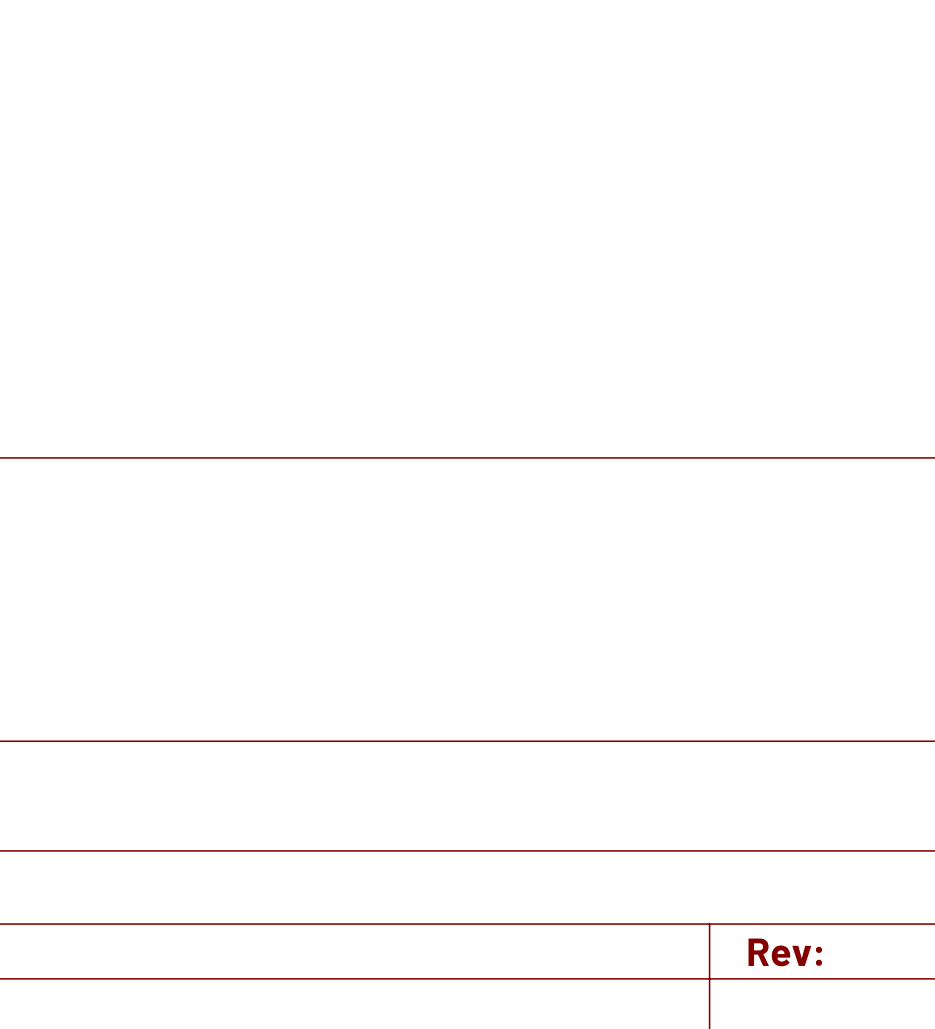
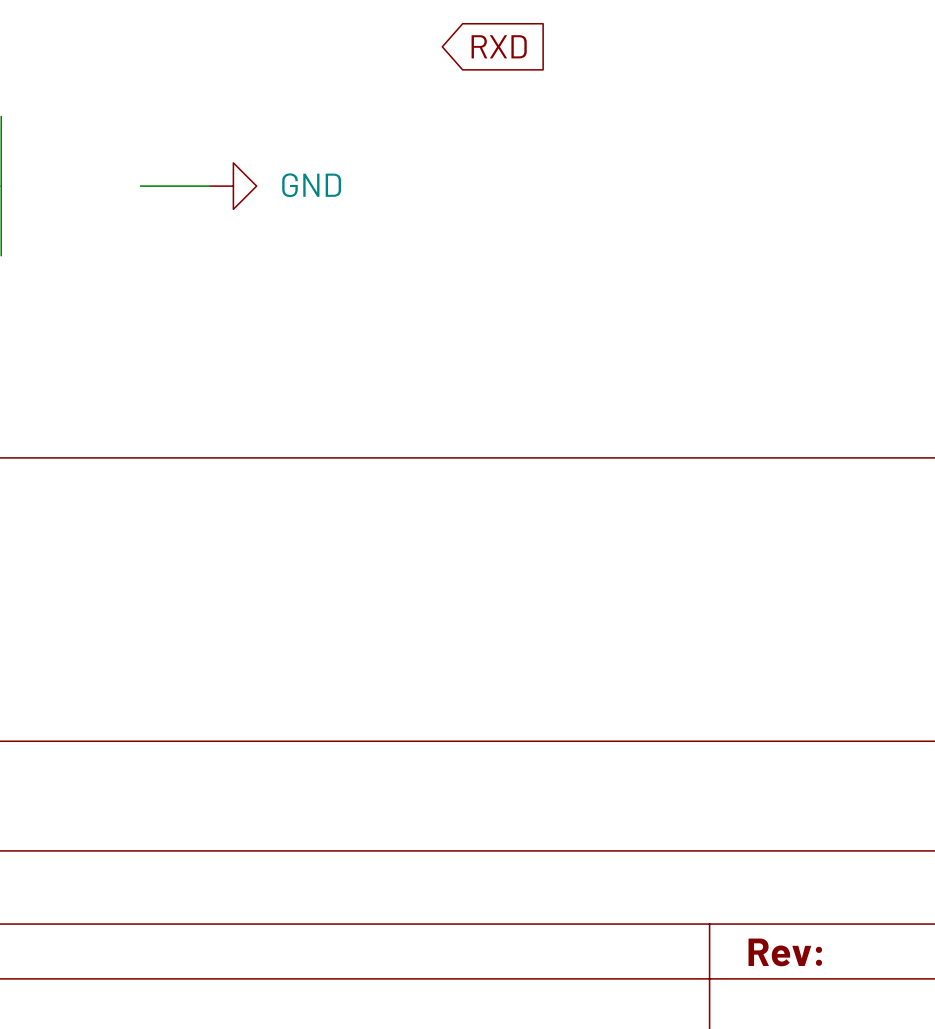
global label: none -> RXD (499, 46)
wire: none -> (1, 116) (1, 255)
wire: none -> (140, 186) (210, 186)
power symbol: none -> GND (233, 186)

